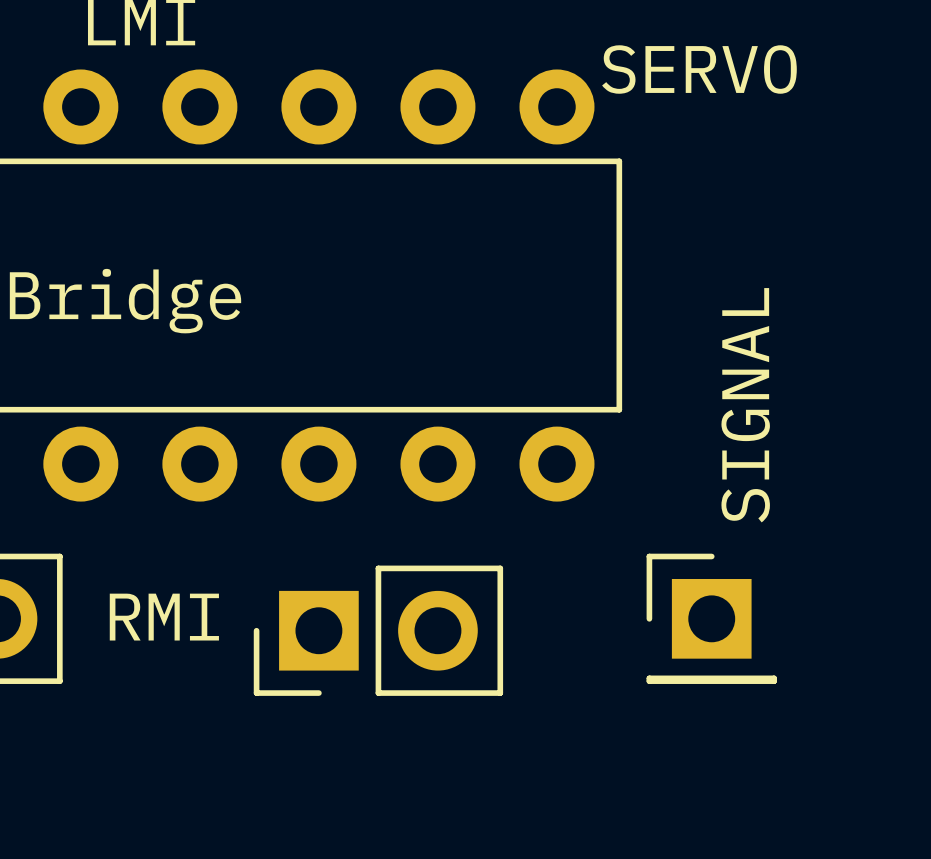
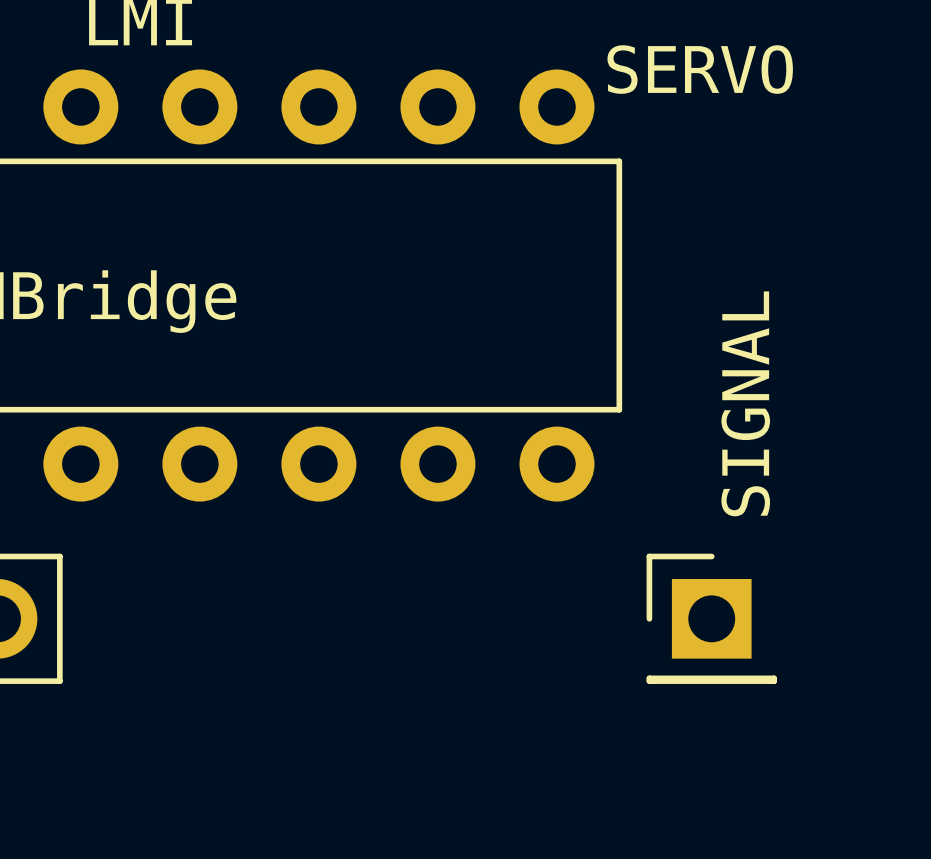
RMI: (378, 630) -> none

